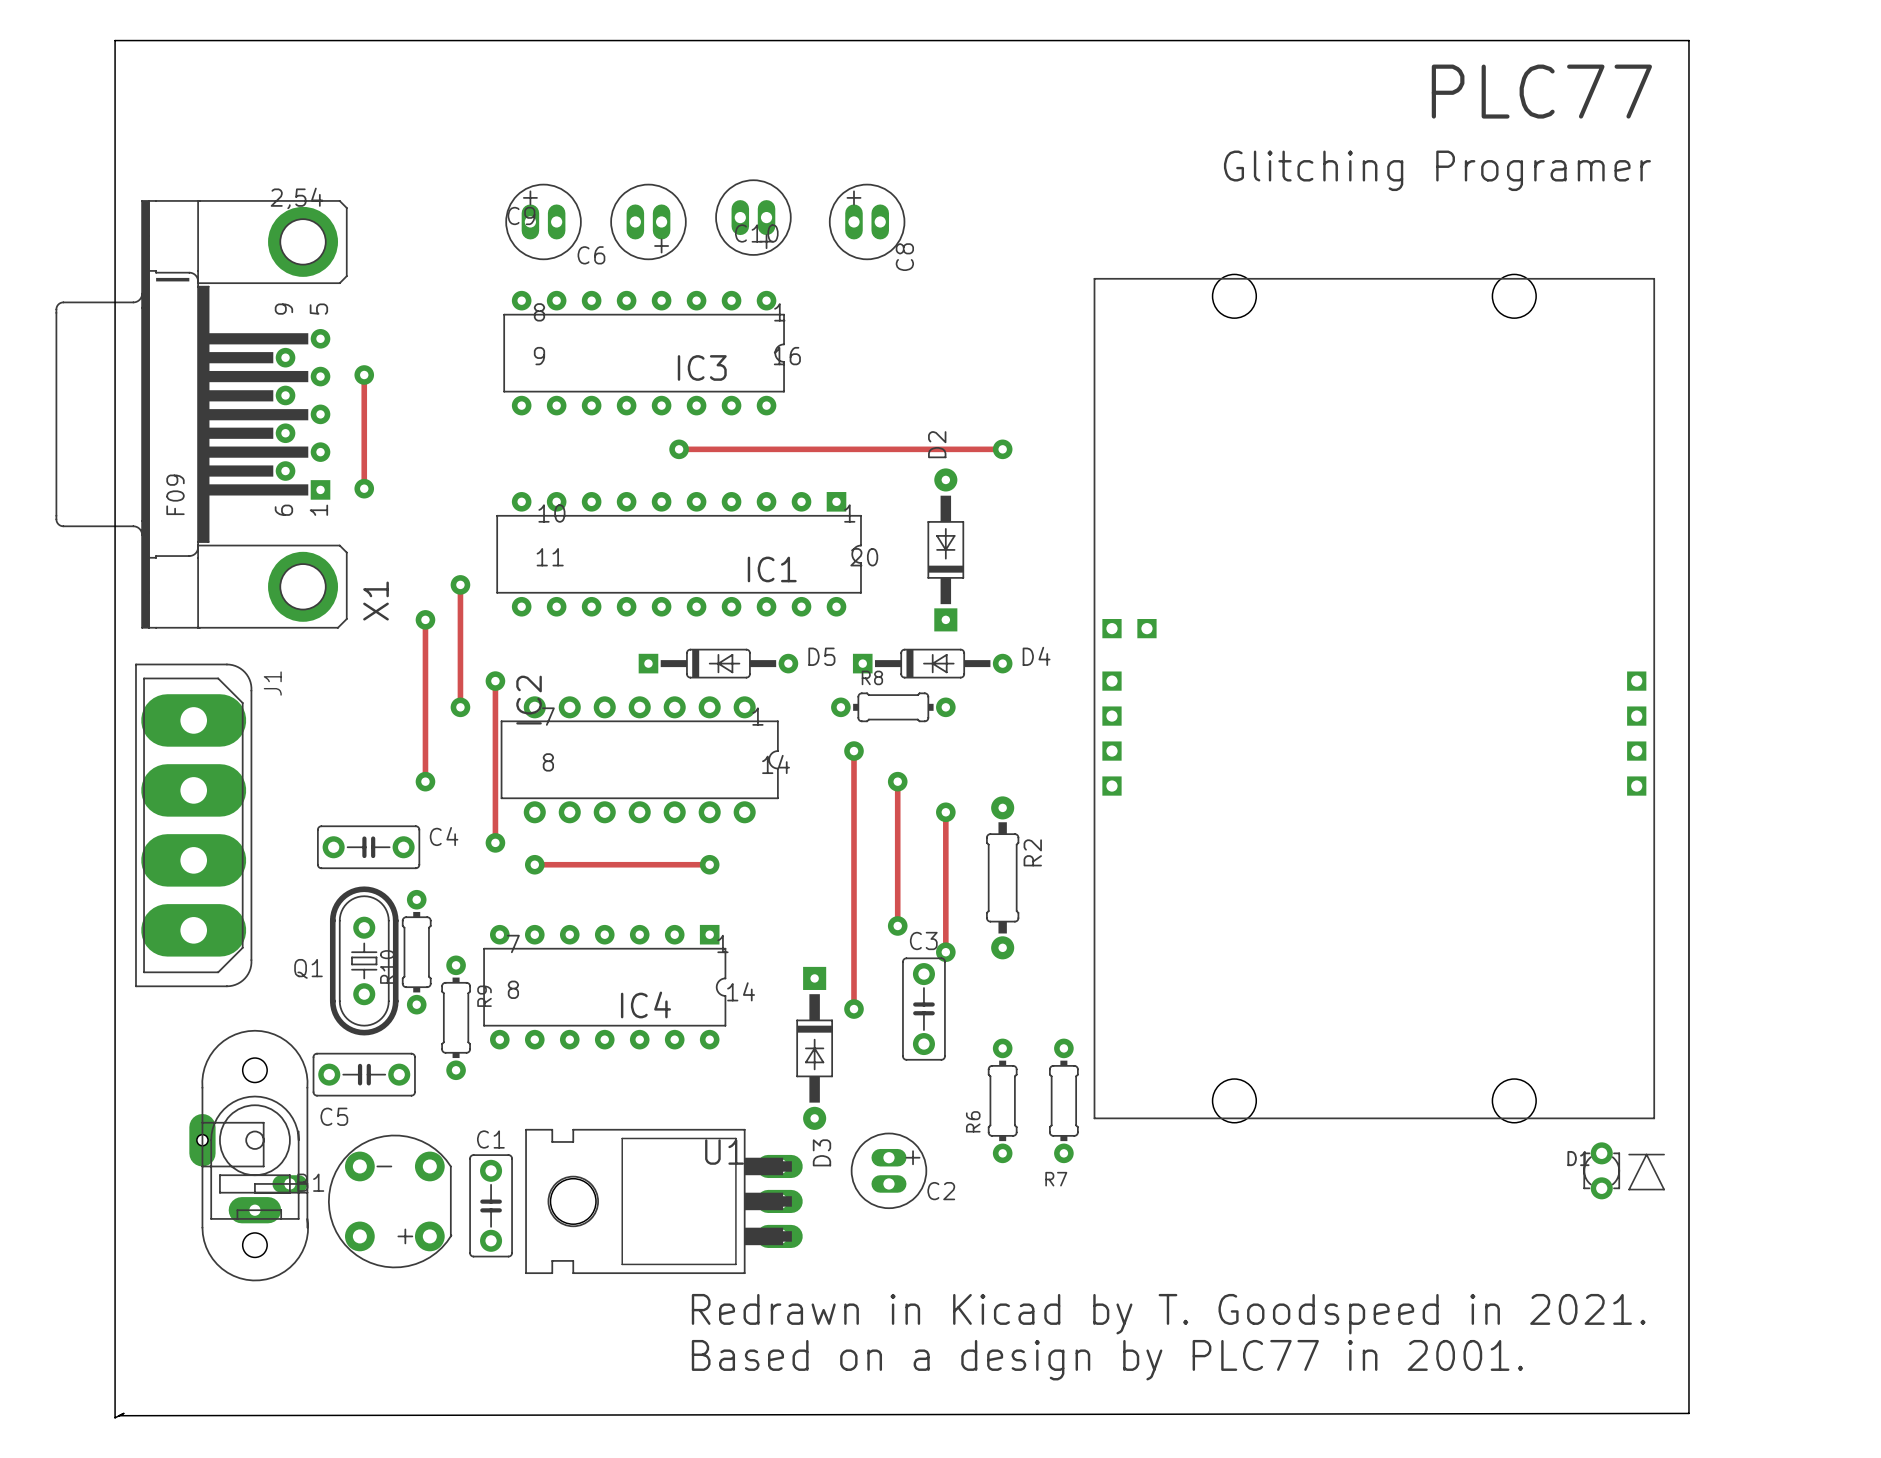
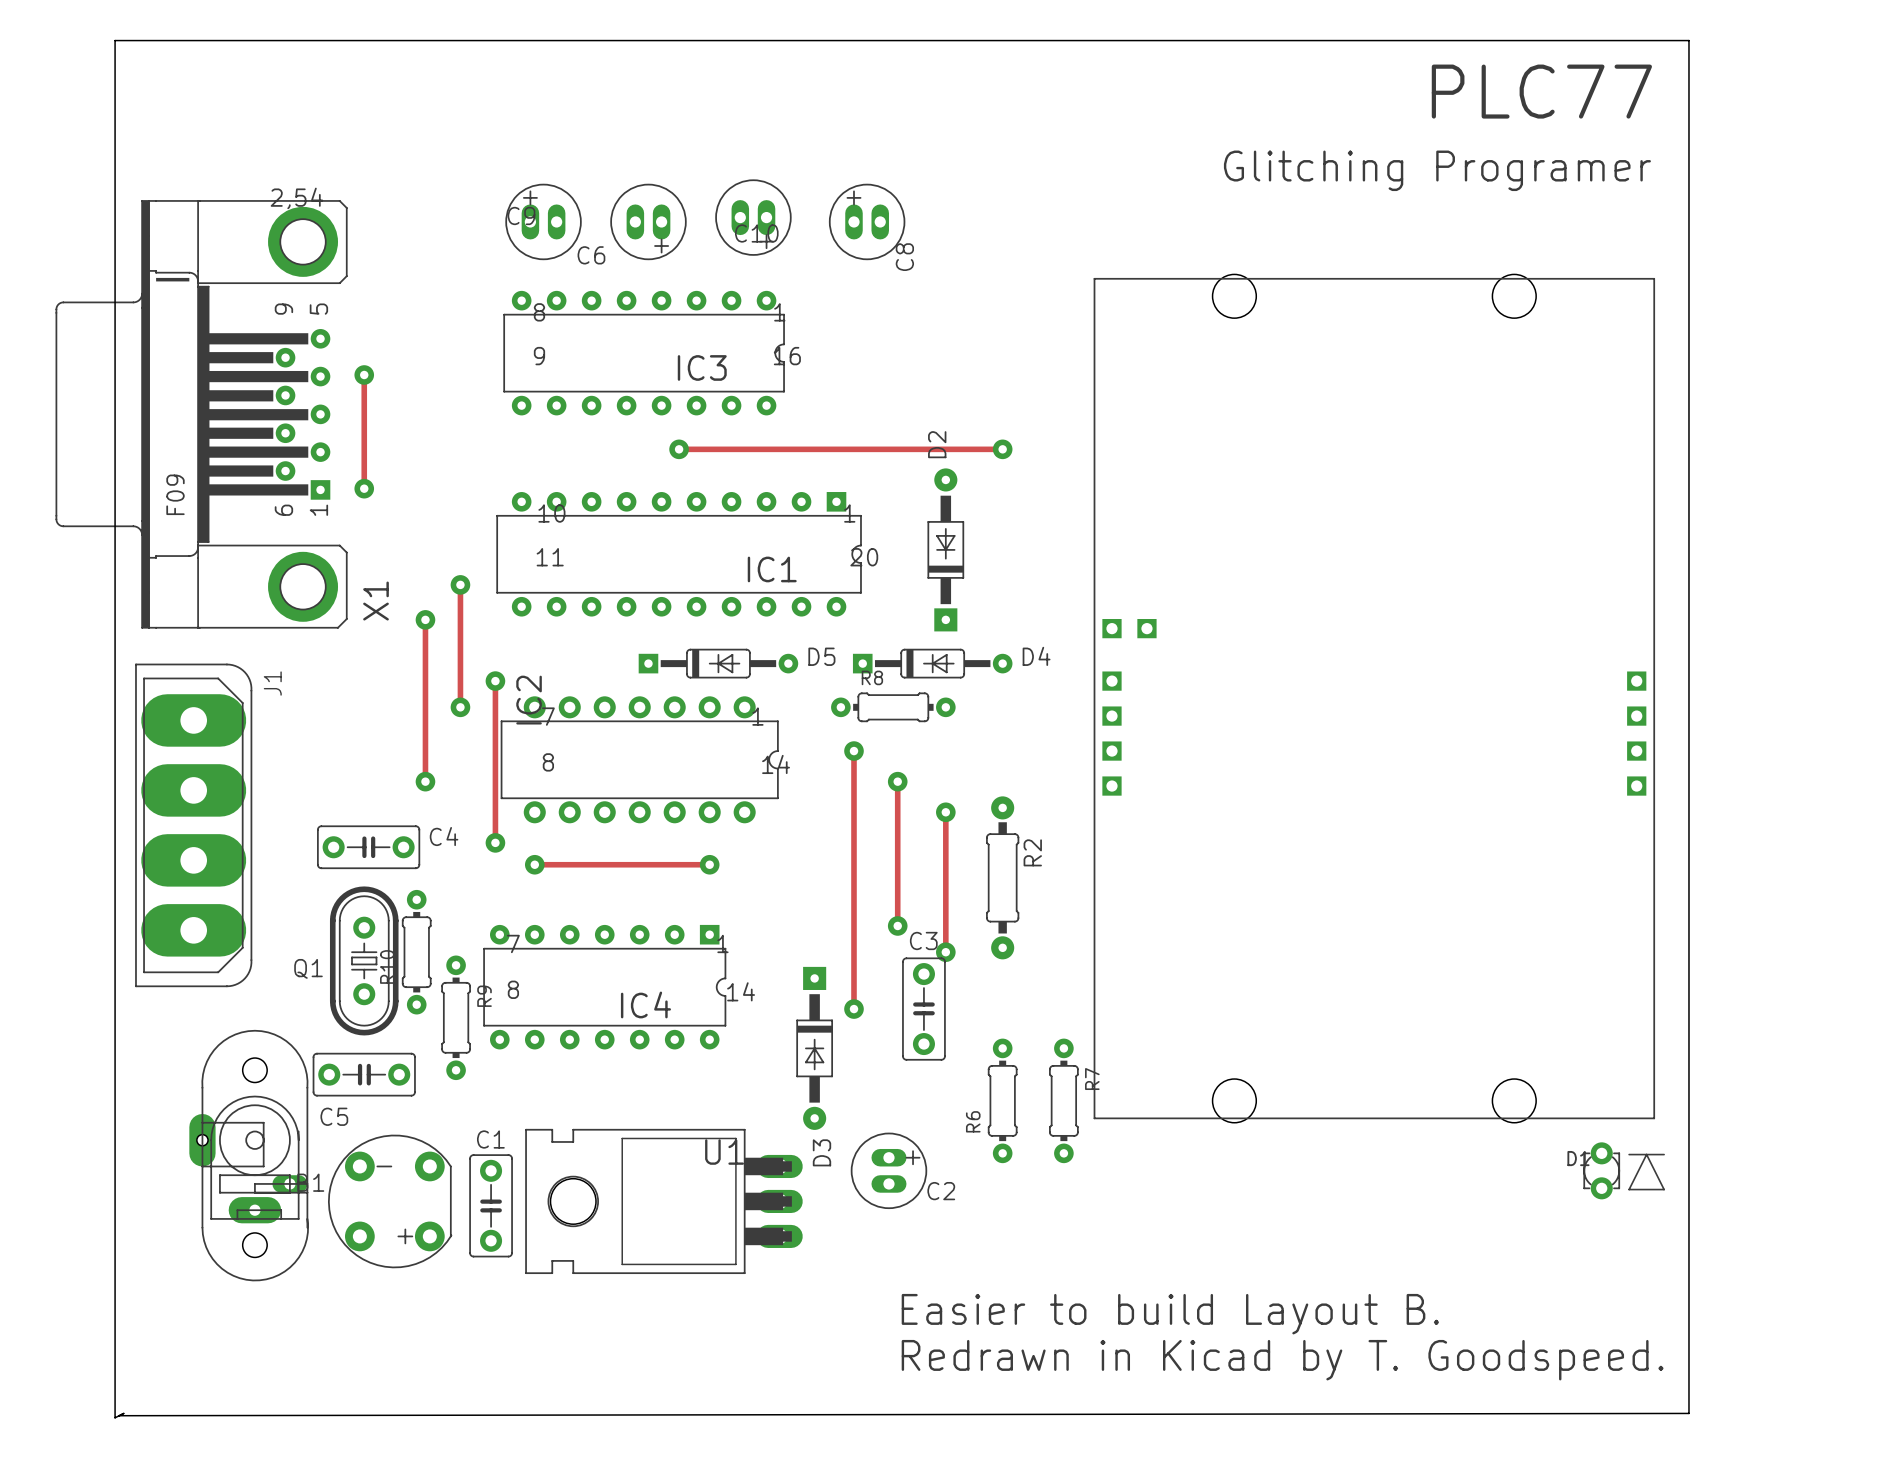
R7 name rotation: 0° (1056, 1179) -> 90° counterclockwise (1092, 1079)
R7 name position: R7 (1056, 1179) -> R7 (1092, 1079)
text: Redrawn in Kicad by T. Goodspeed in 2021. (1168, 1314) -> Redrawn in Kicad by T. Goodspeed. (1282, 1360)
text: none -> Easier to build Layout B. (1170, 1314)
text: Based on a design by PLC77 in 2001. (1107, 1360) -> none

